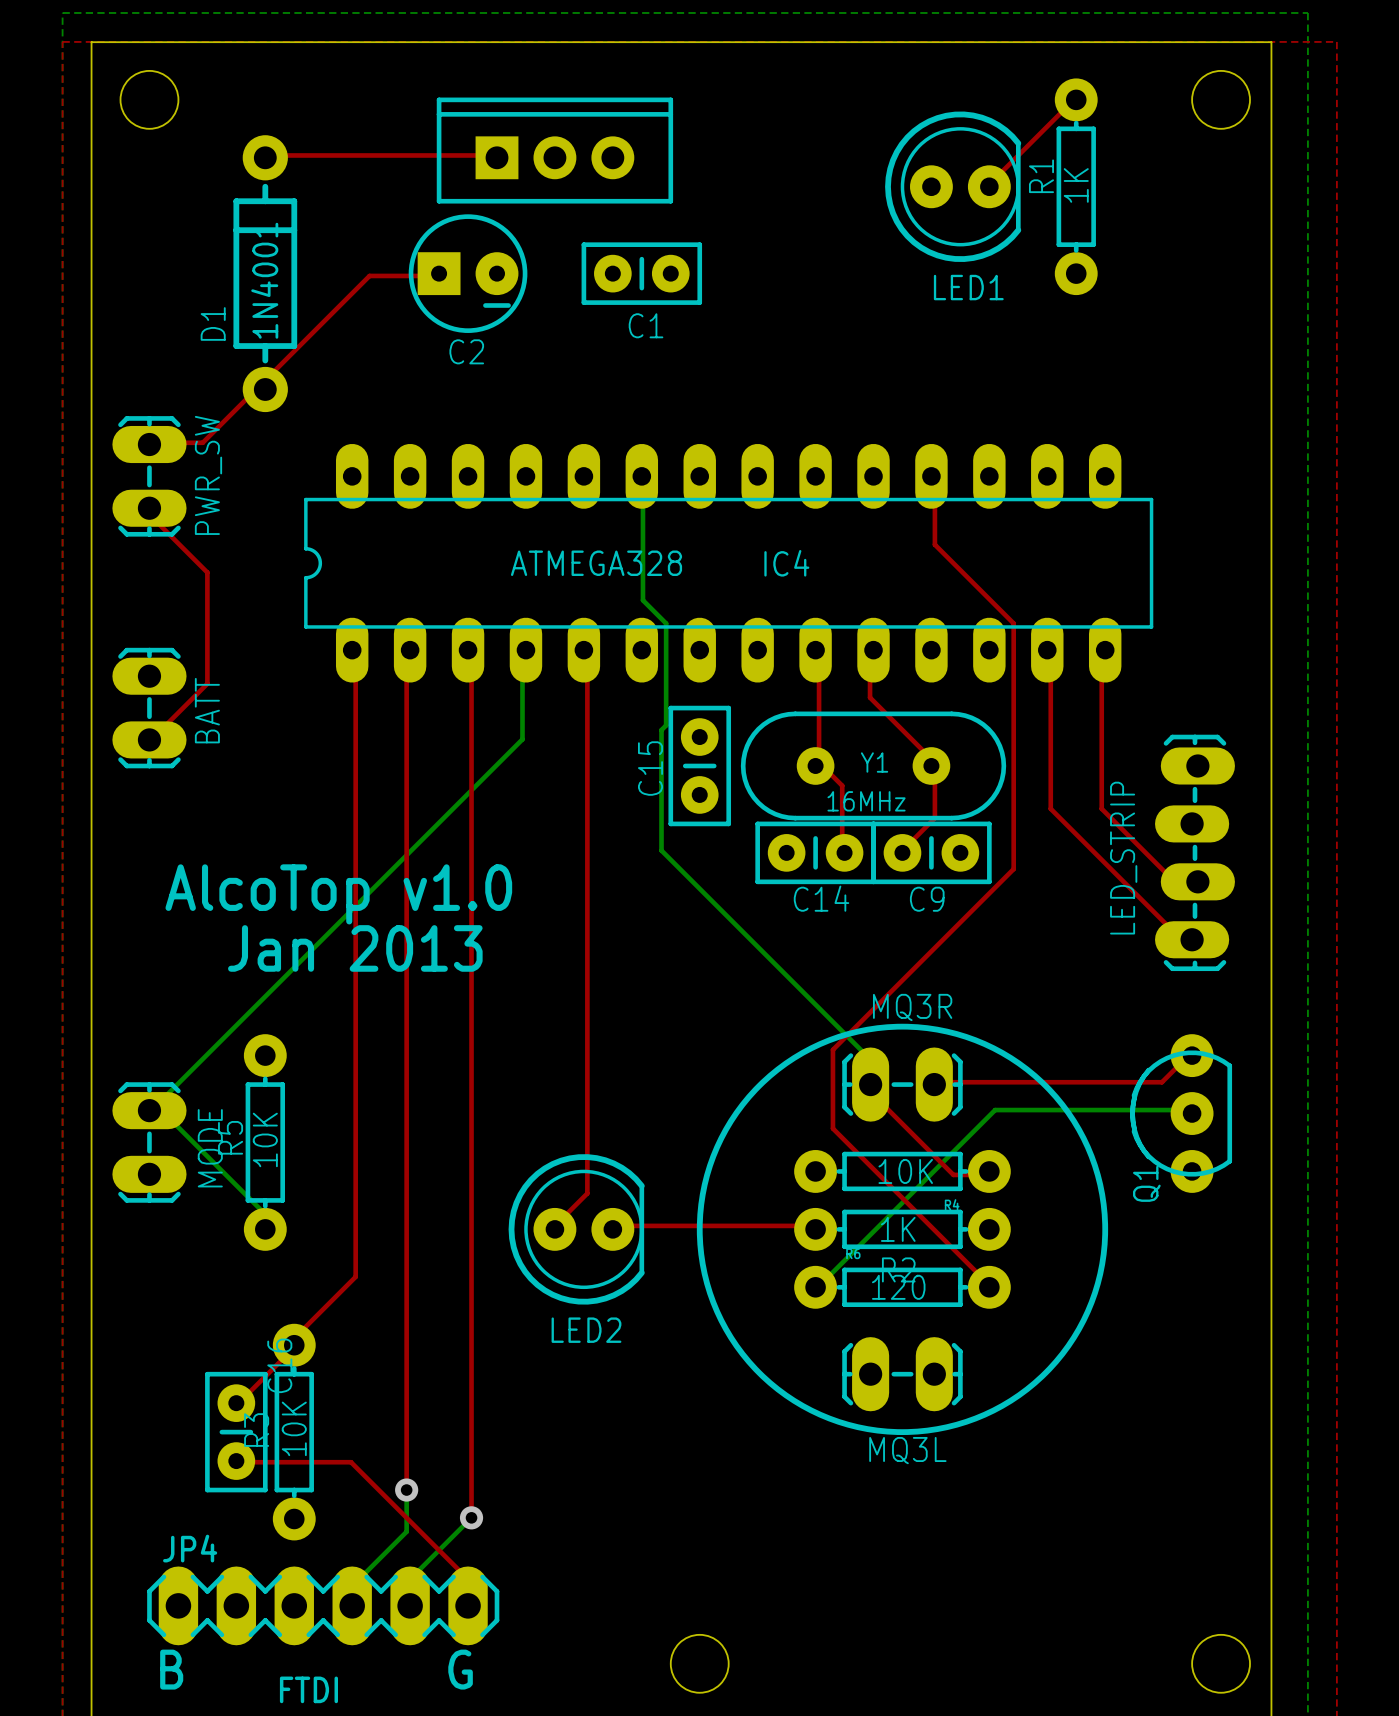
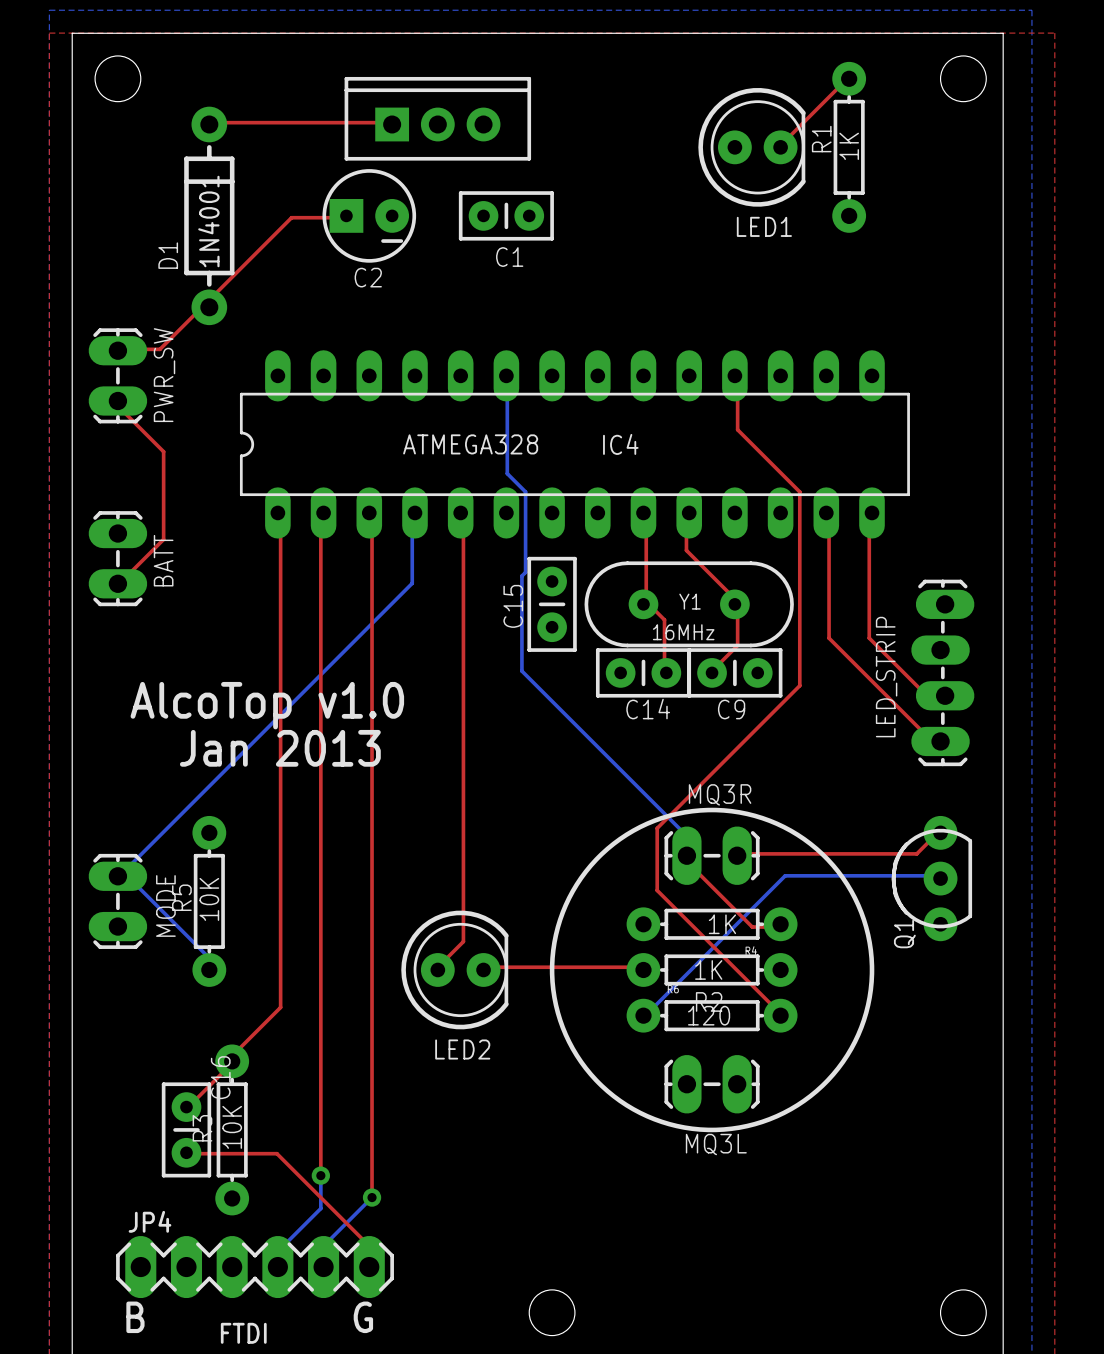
R4 value: 10K (905, 1171) -> 1K (722, 924)

